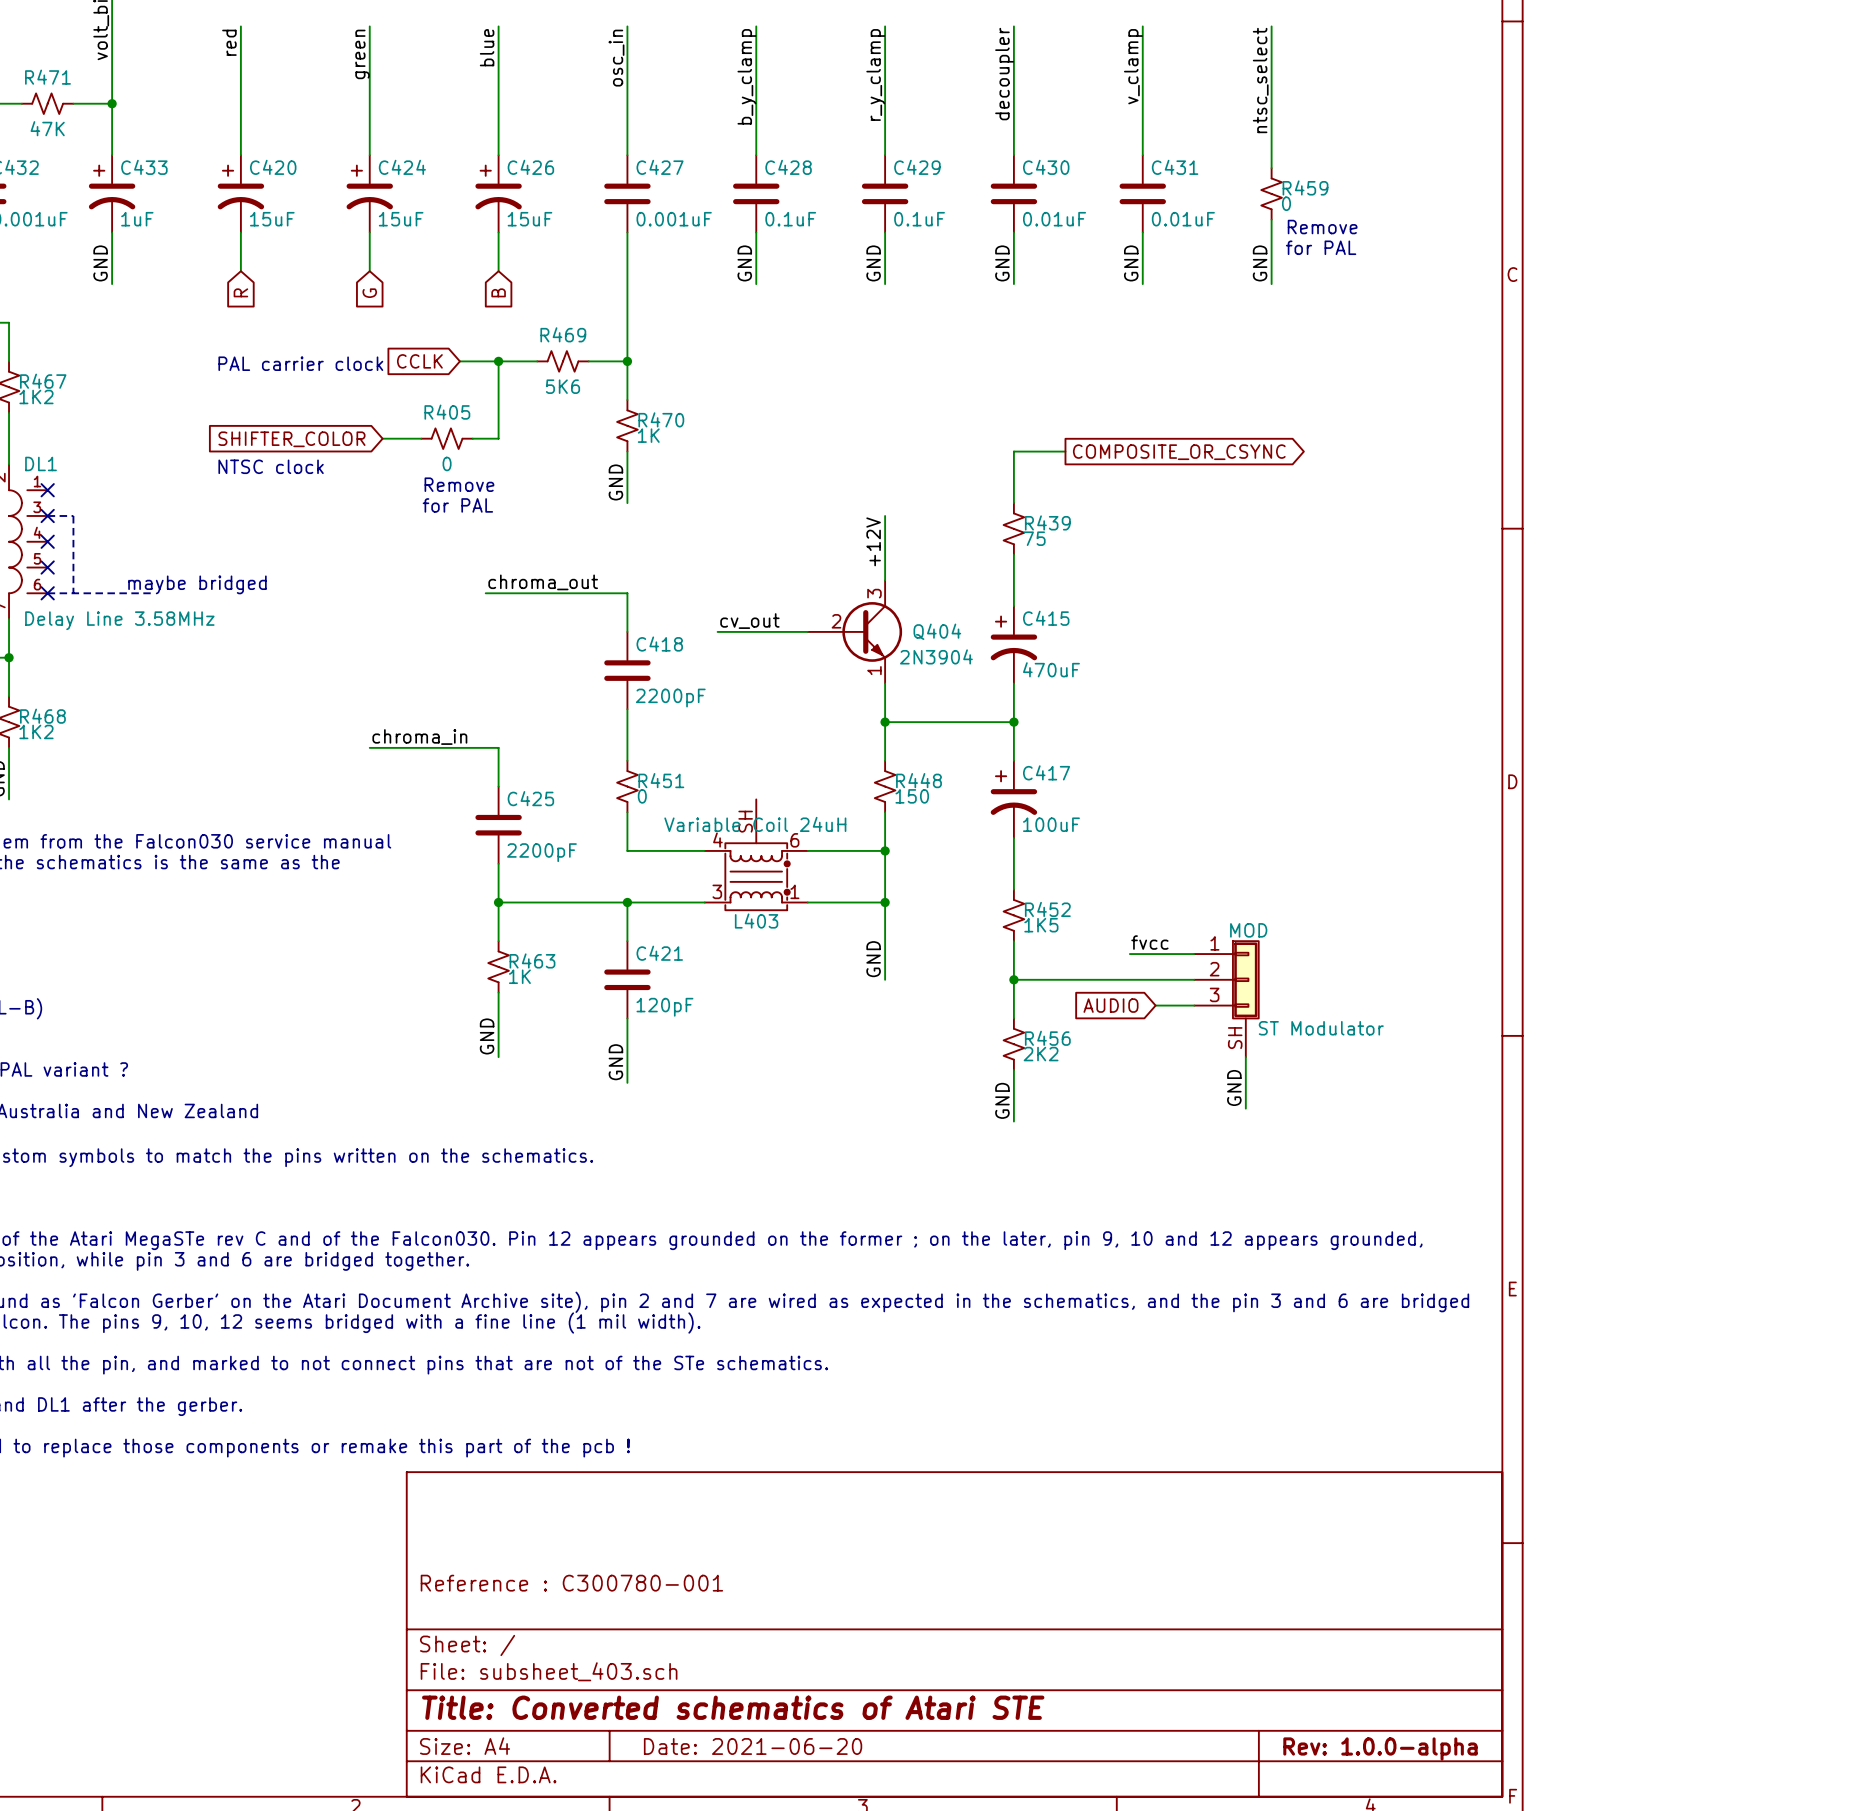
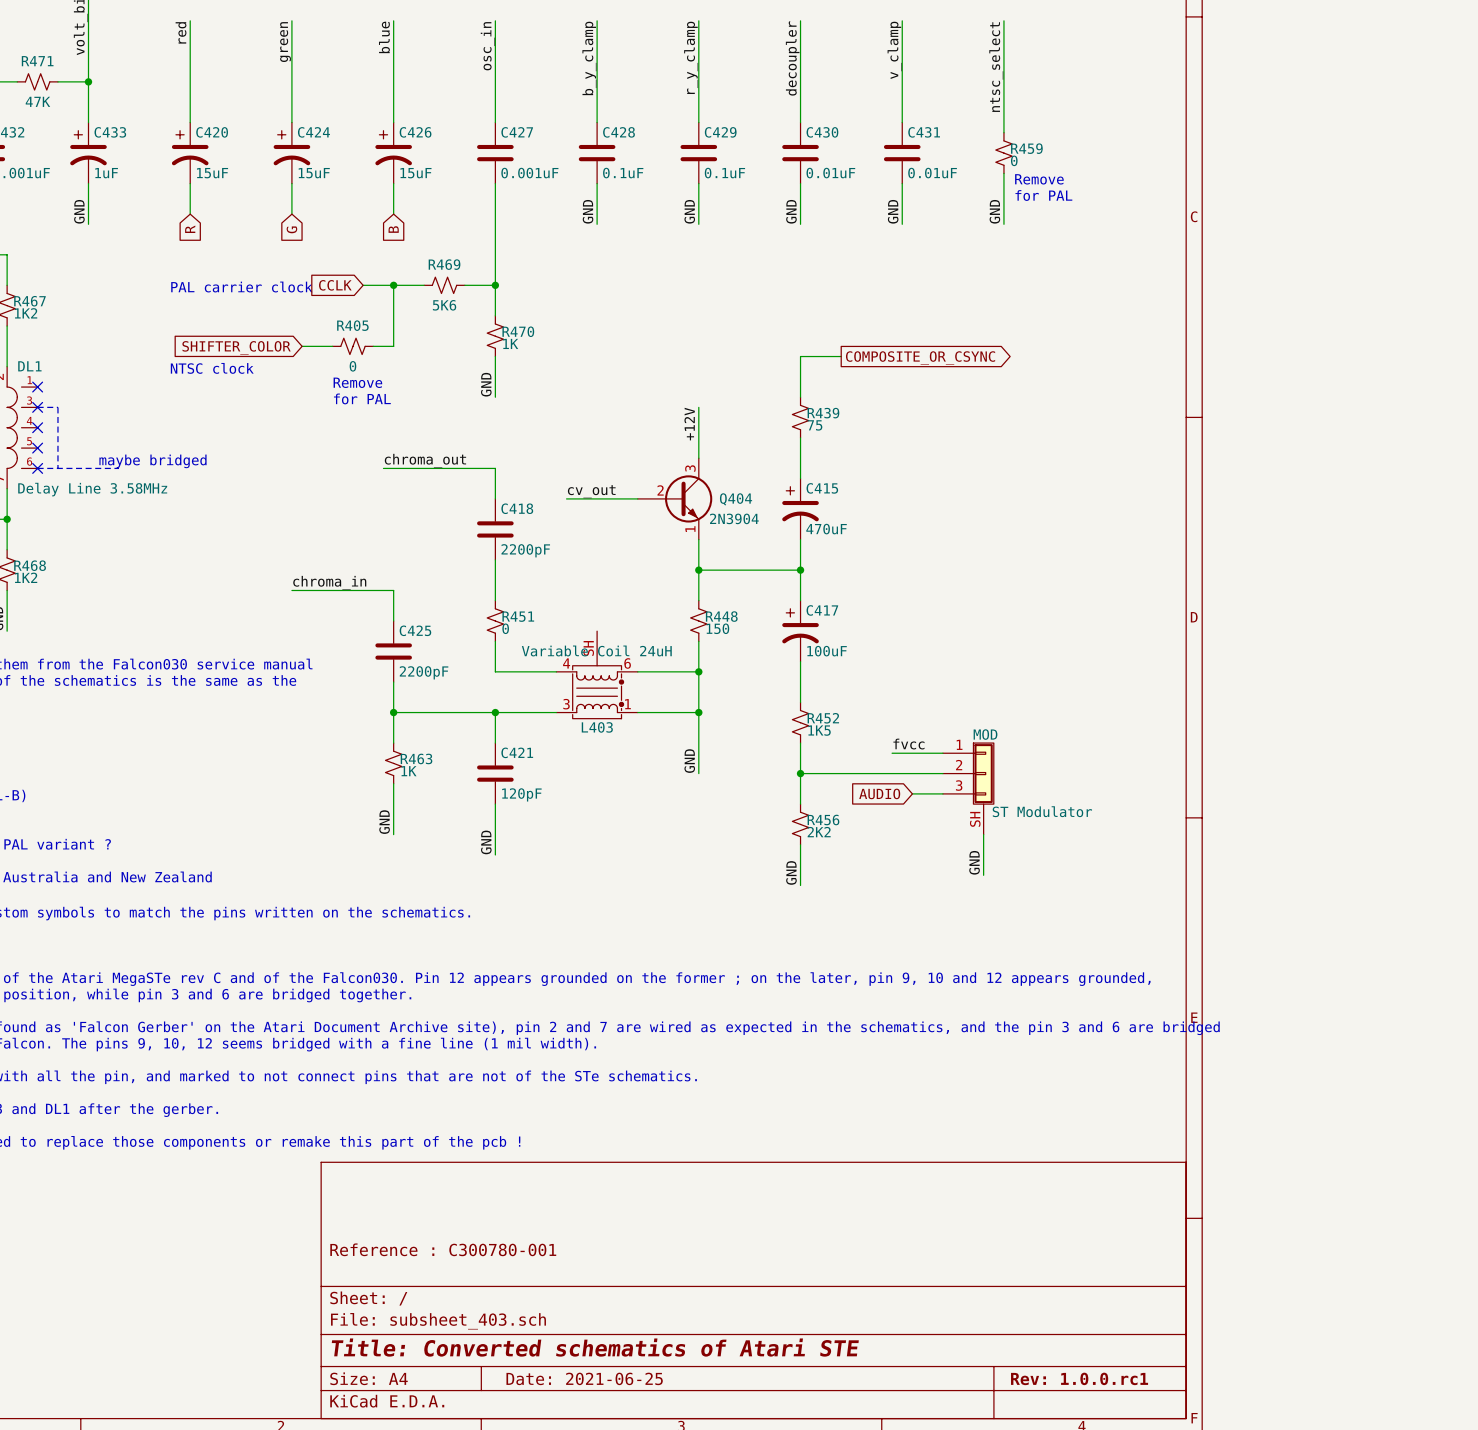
title block: Date: 2021-06-20 (753, 1746) -> Date: 2021-06-25 (584, 1378)
title block: Rev: 1.0.0-alpha (1380, 1749) -> Rev: 1.0.0.rc1 (1079, 1378)

